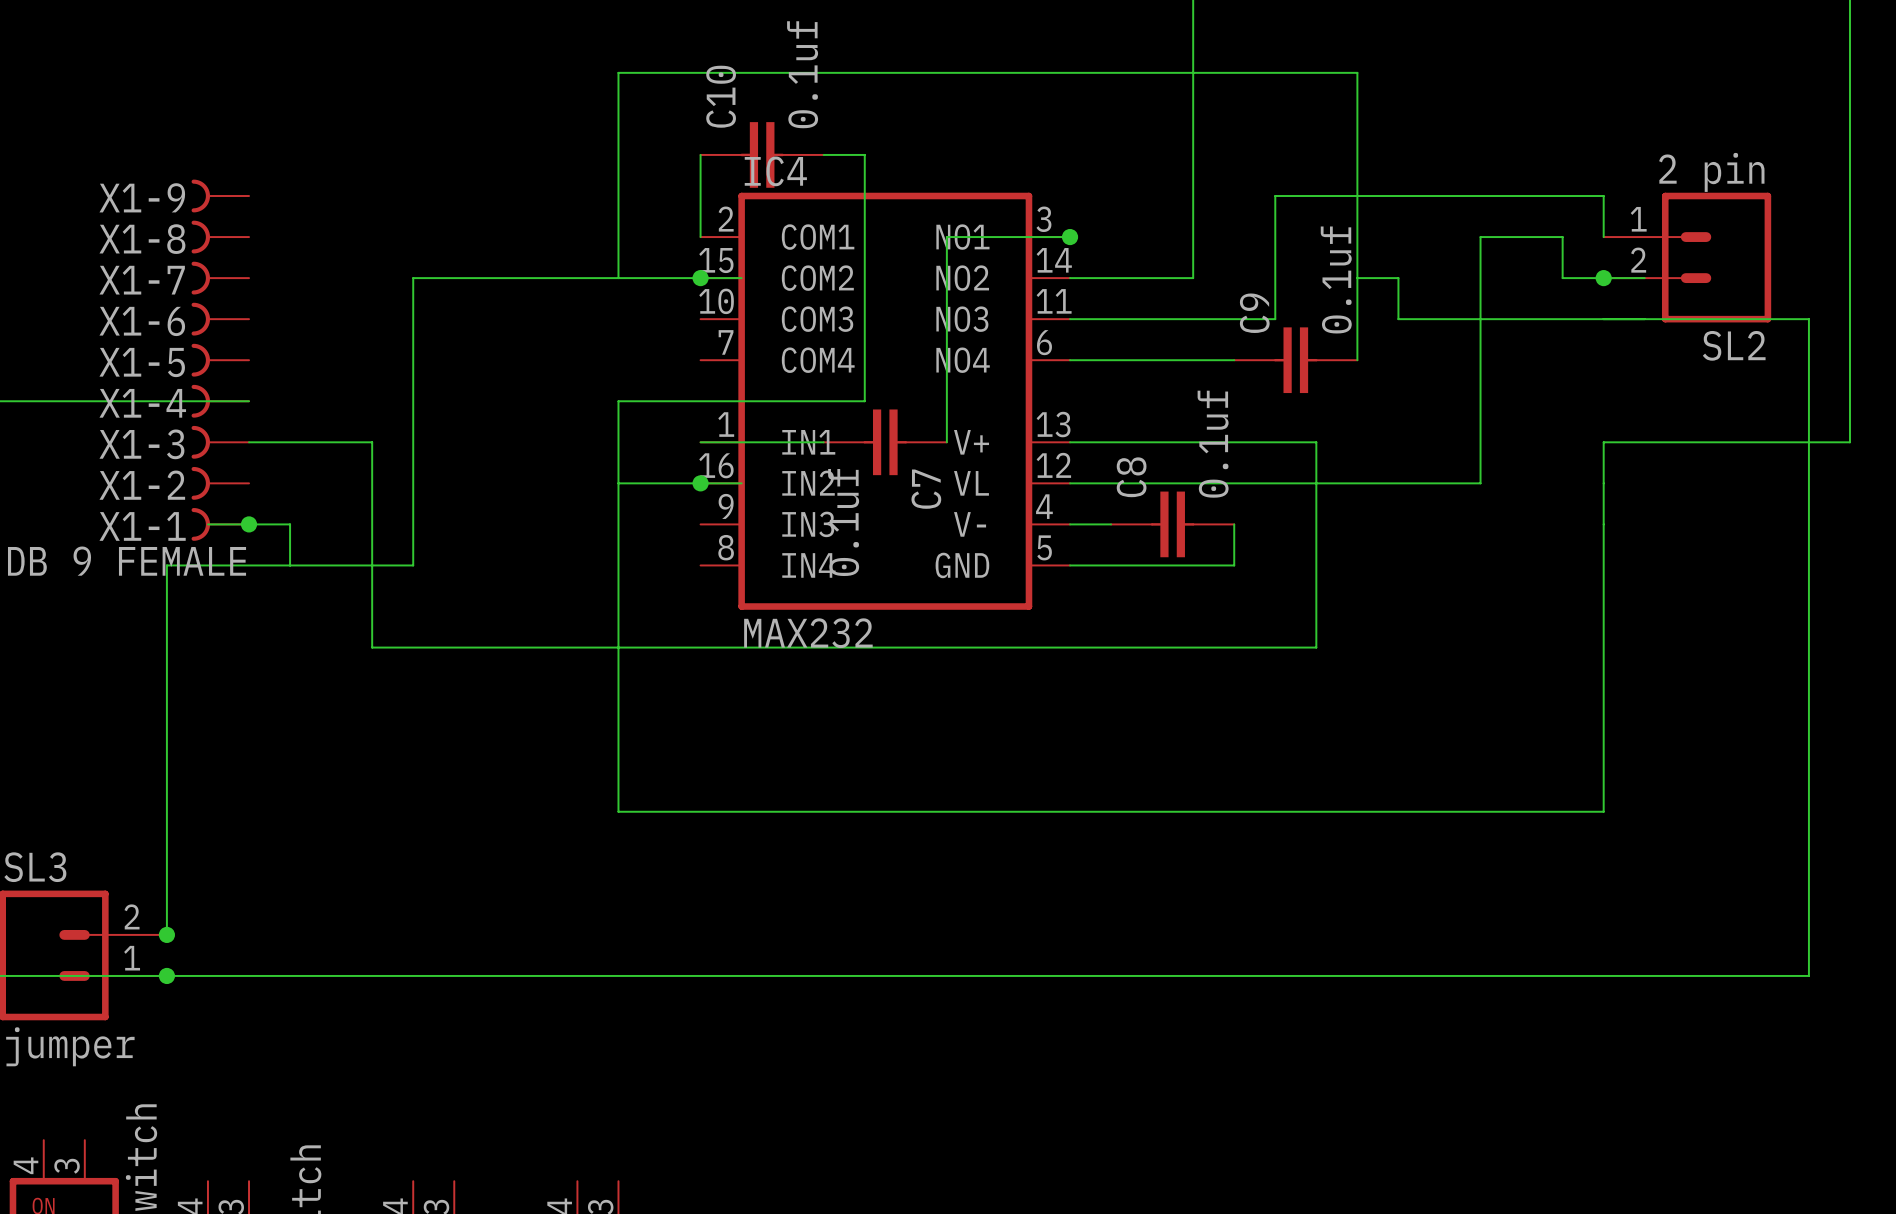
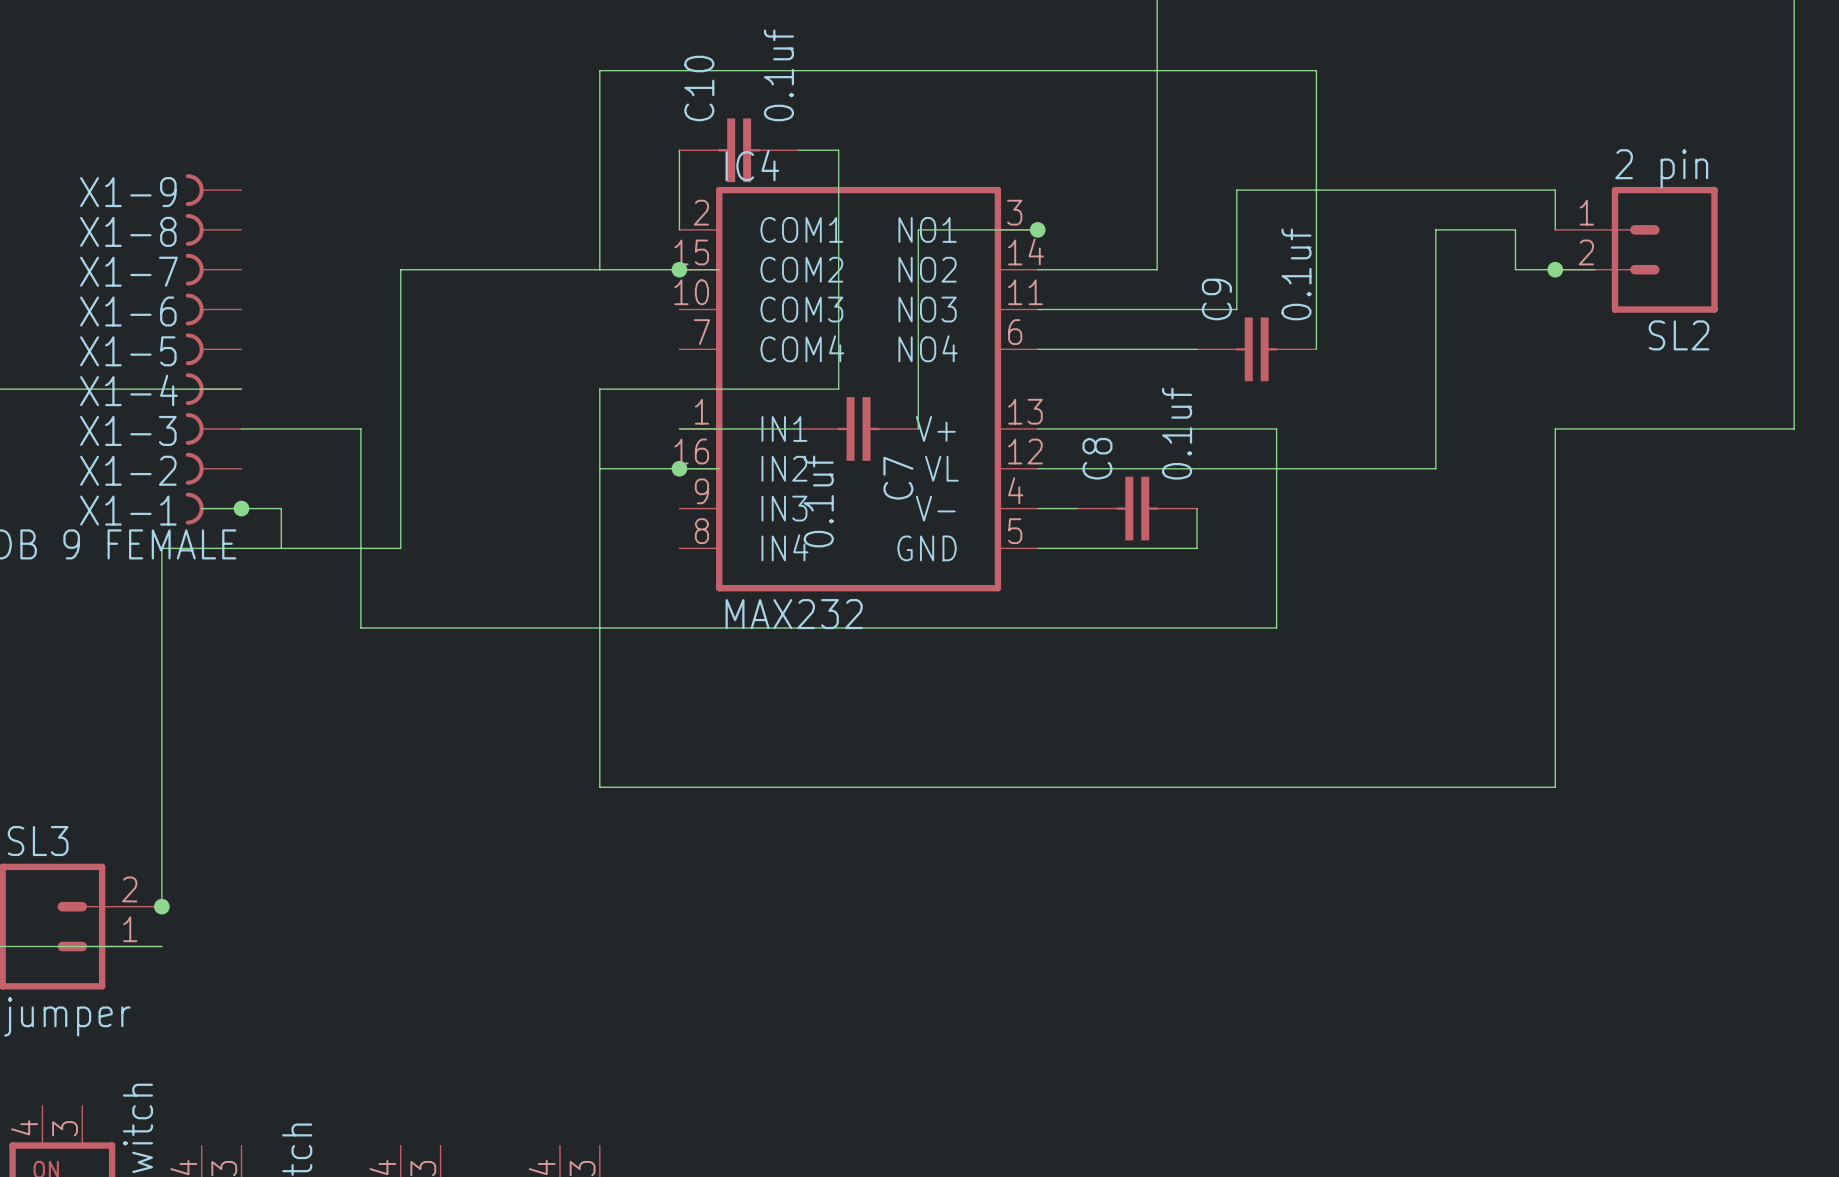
wire: (1357, 278) (1398, 278) (1398, 319) (1808, 319) (1808, 975) (166, 975) -> none
junction: (166, 975) -> none

